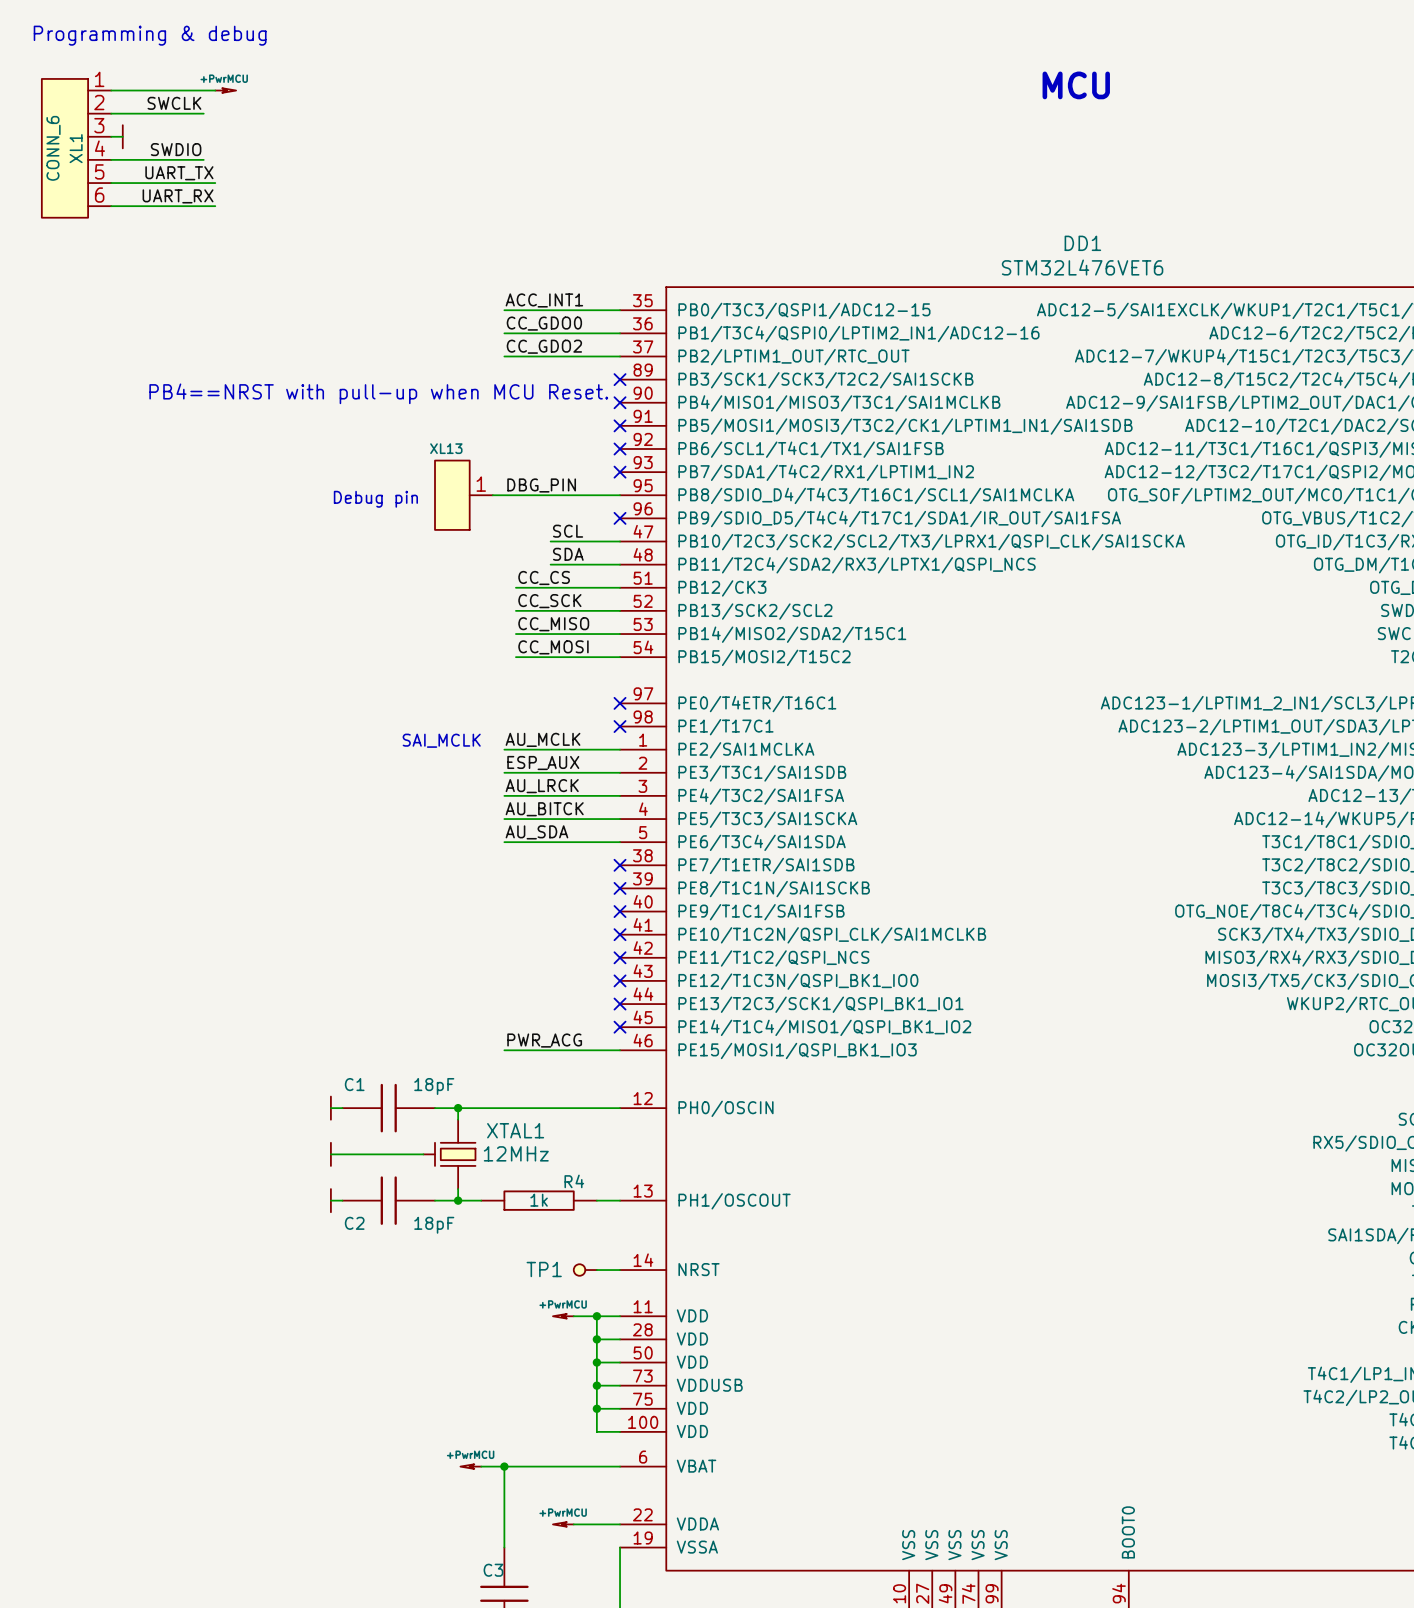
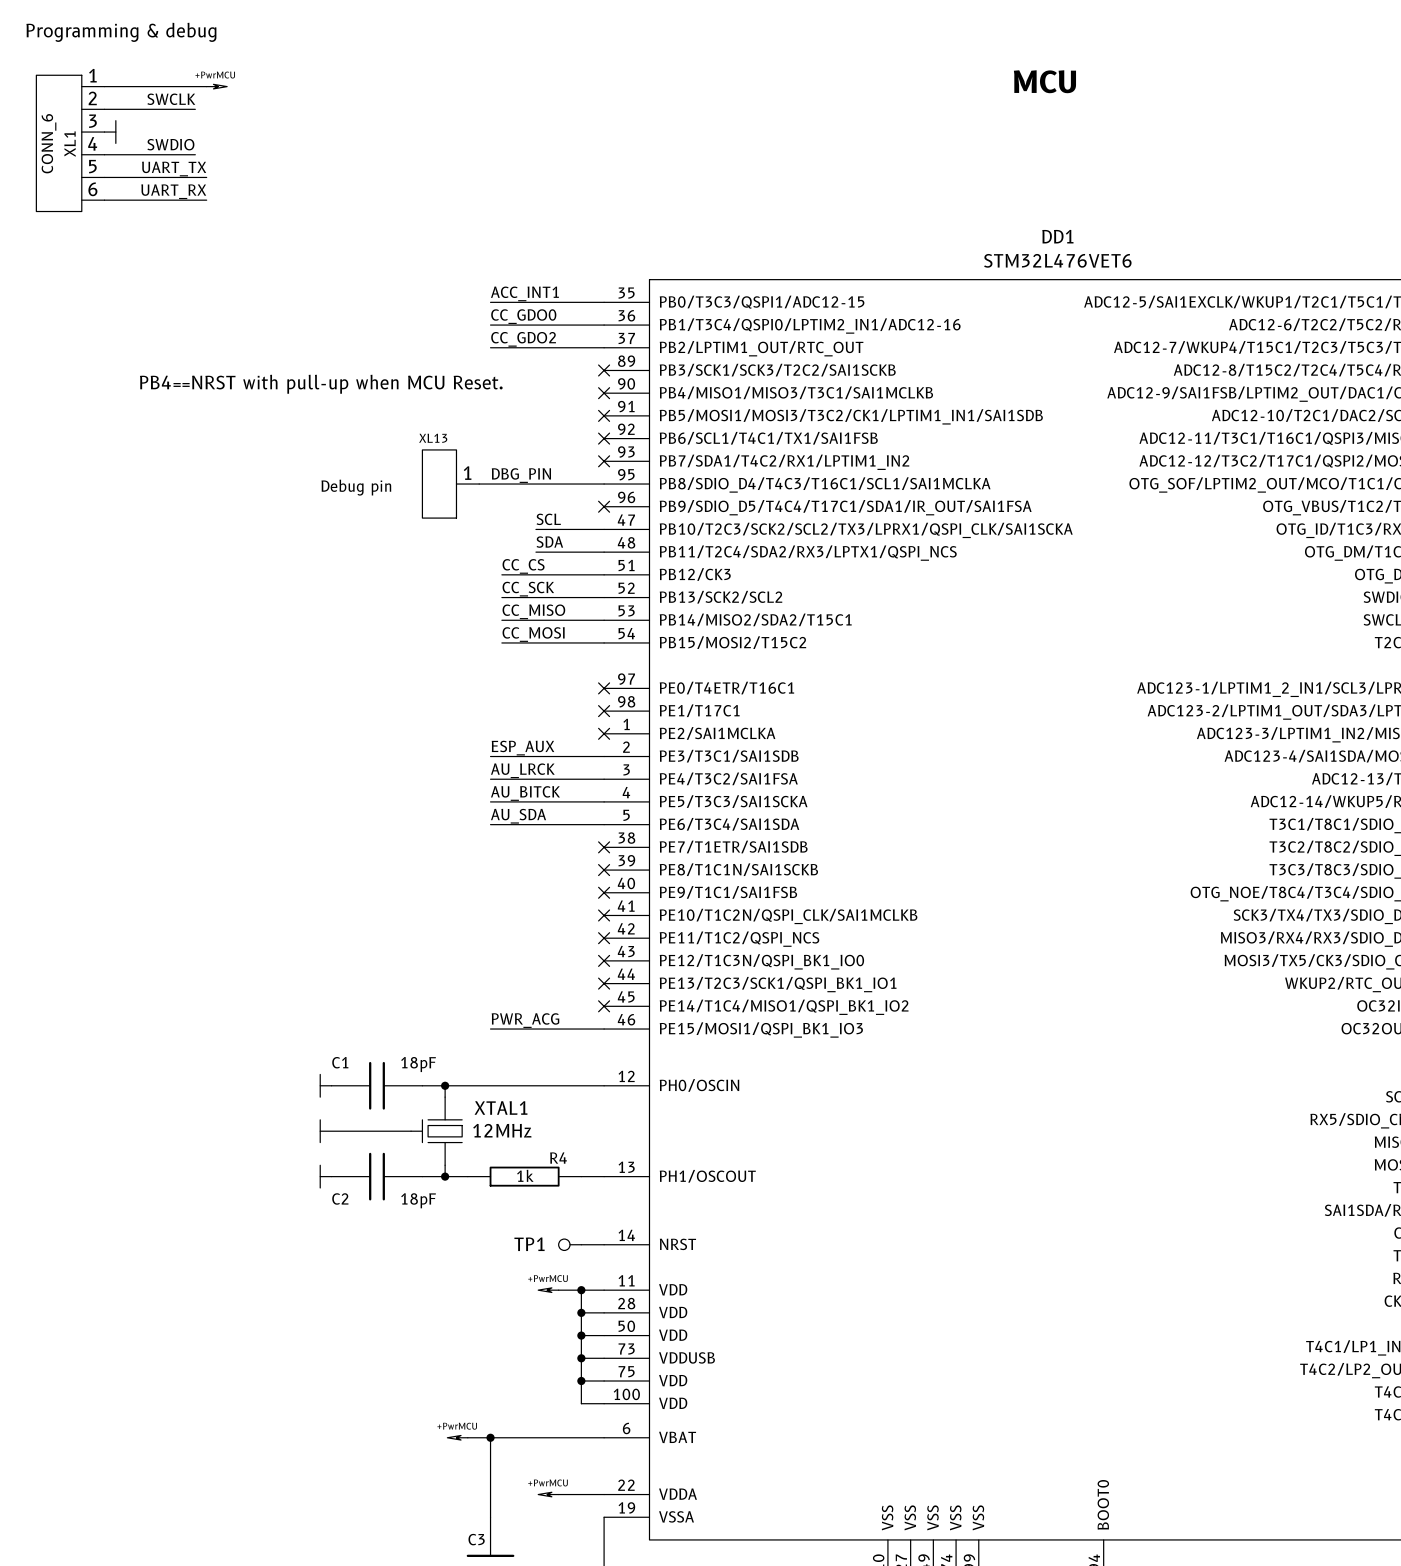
label: AU_MCLK (543, 739) -> none
text: SAI_MCLK (441, 740) -> none
wire: (504, 749) (620, 749) -> none
no-connect mark: none -> (604, 733)

